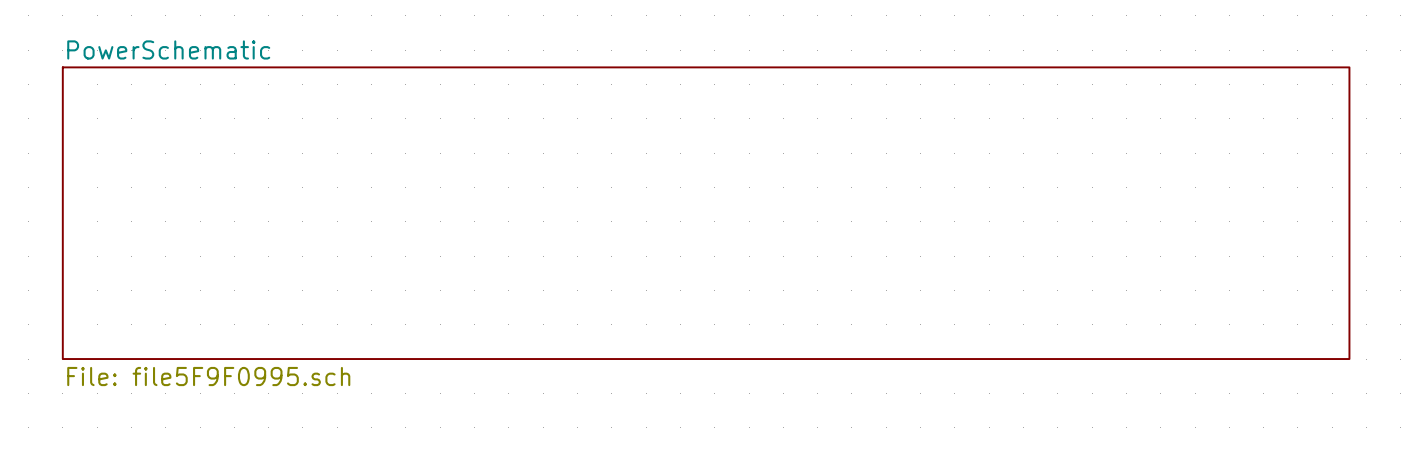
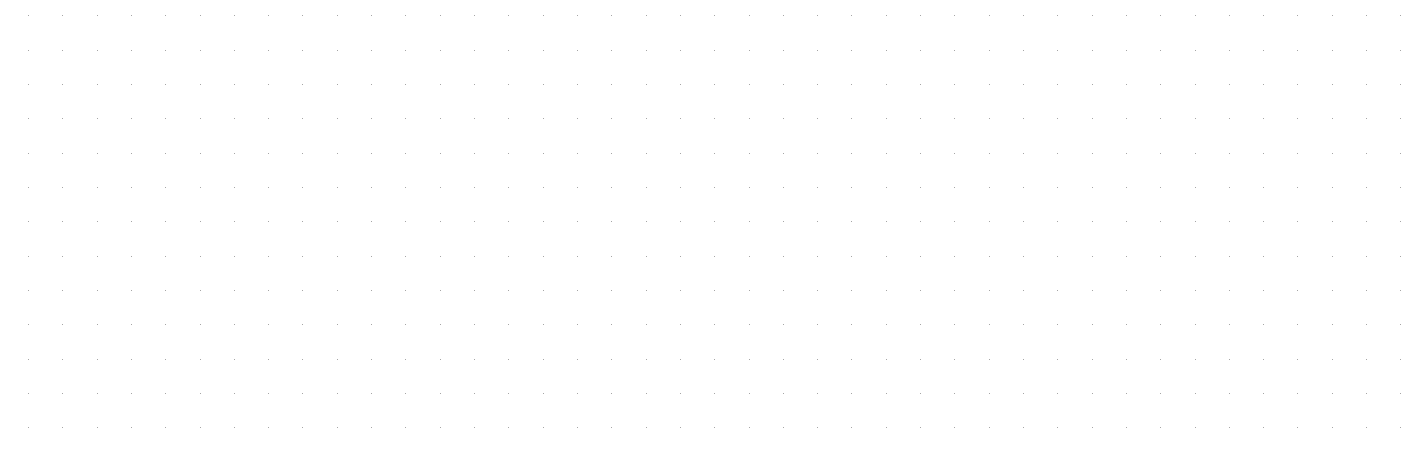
sheet PowerSchematic: File: file5F9F0995.sch (706, 213) -> none

